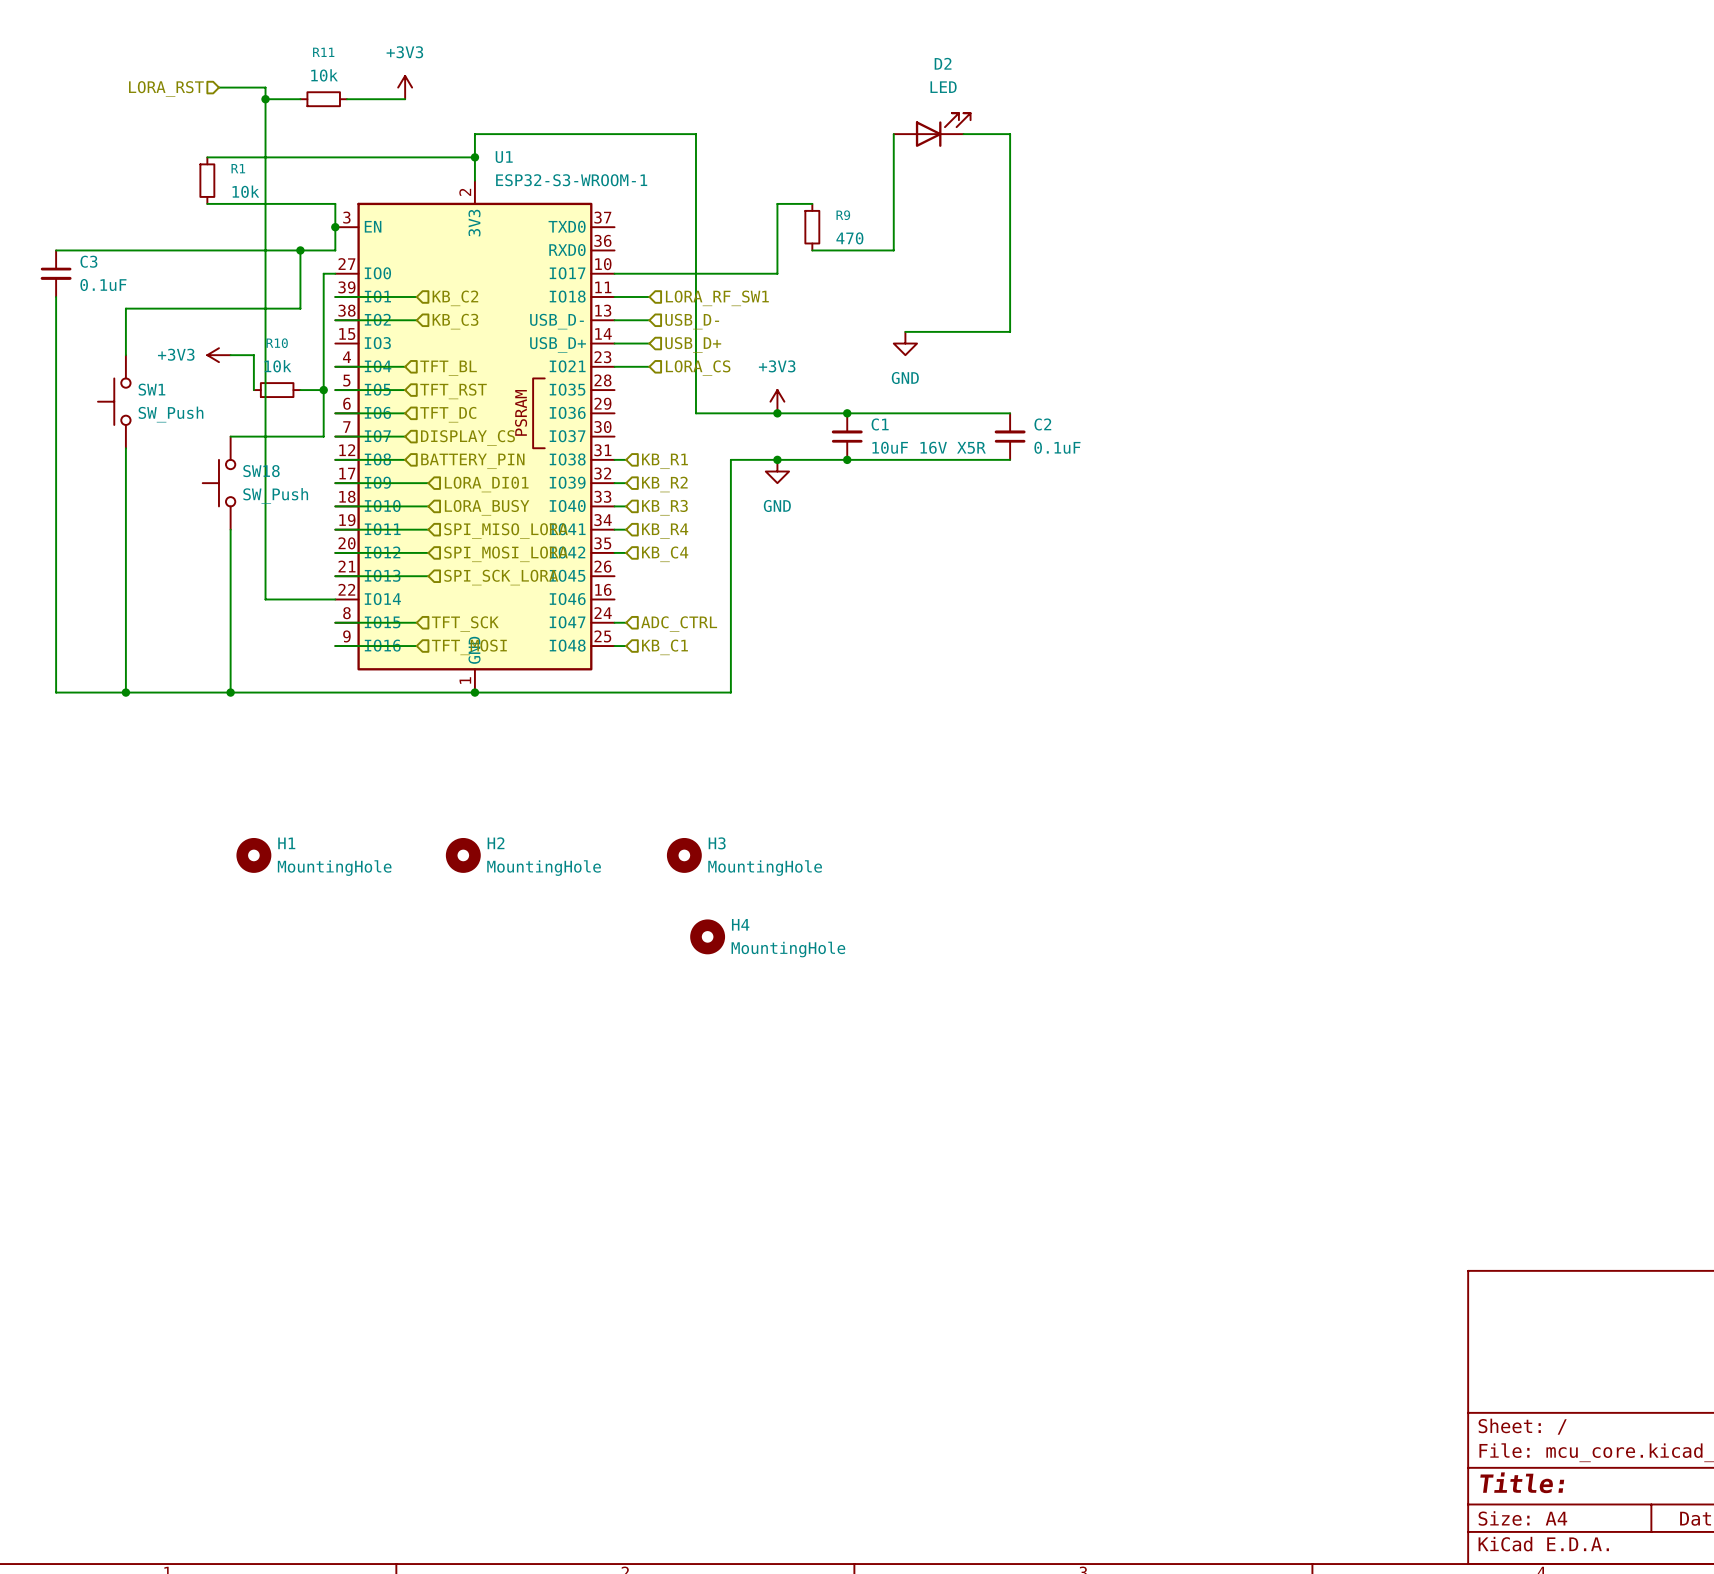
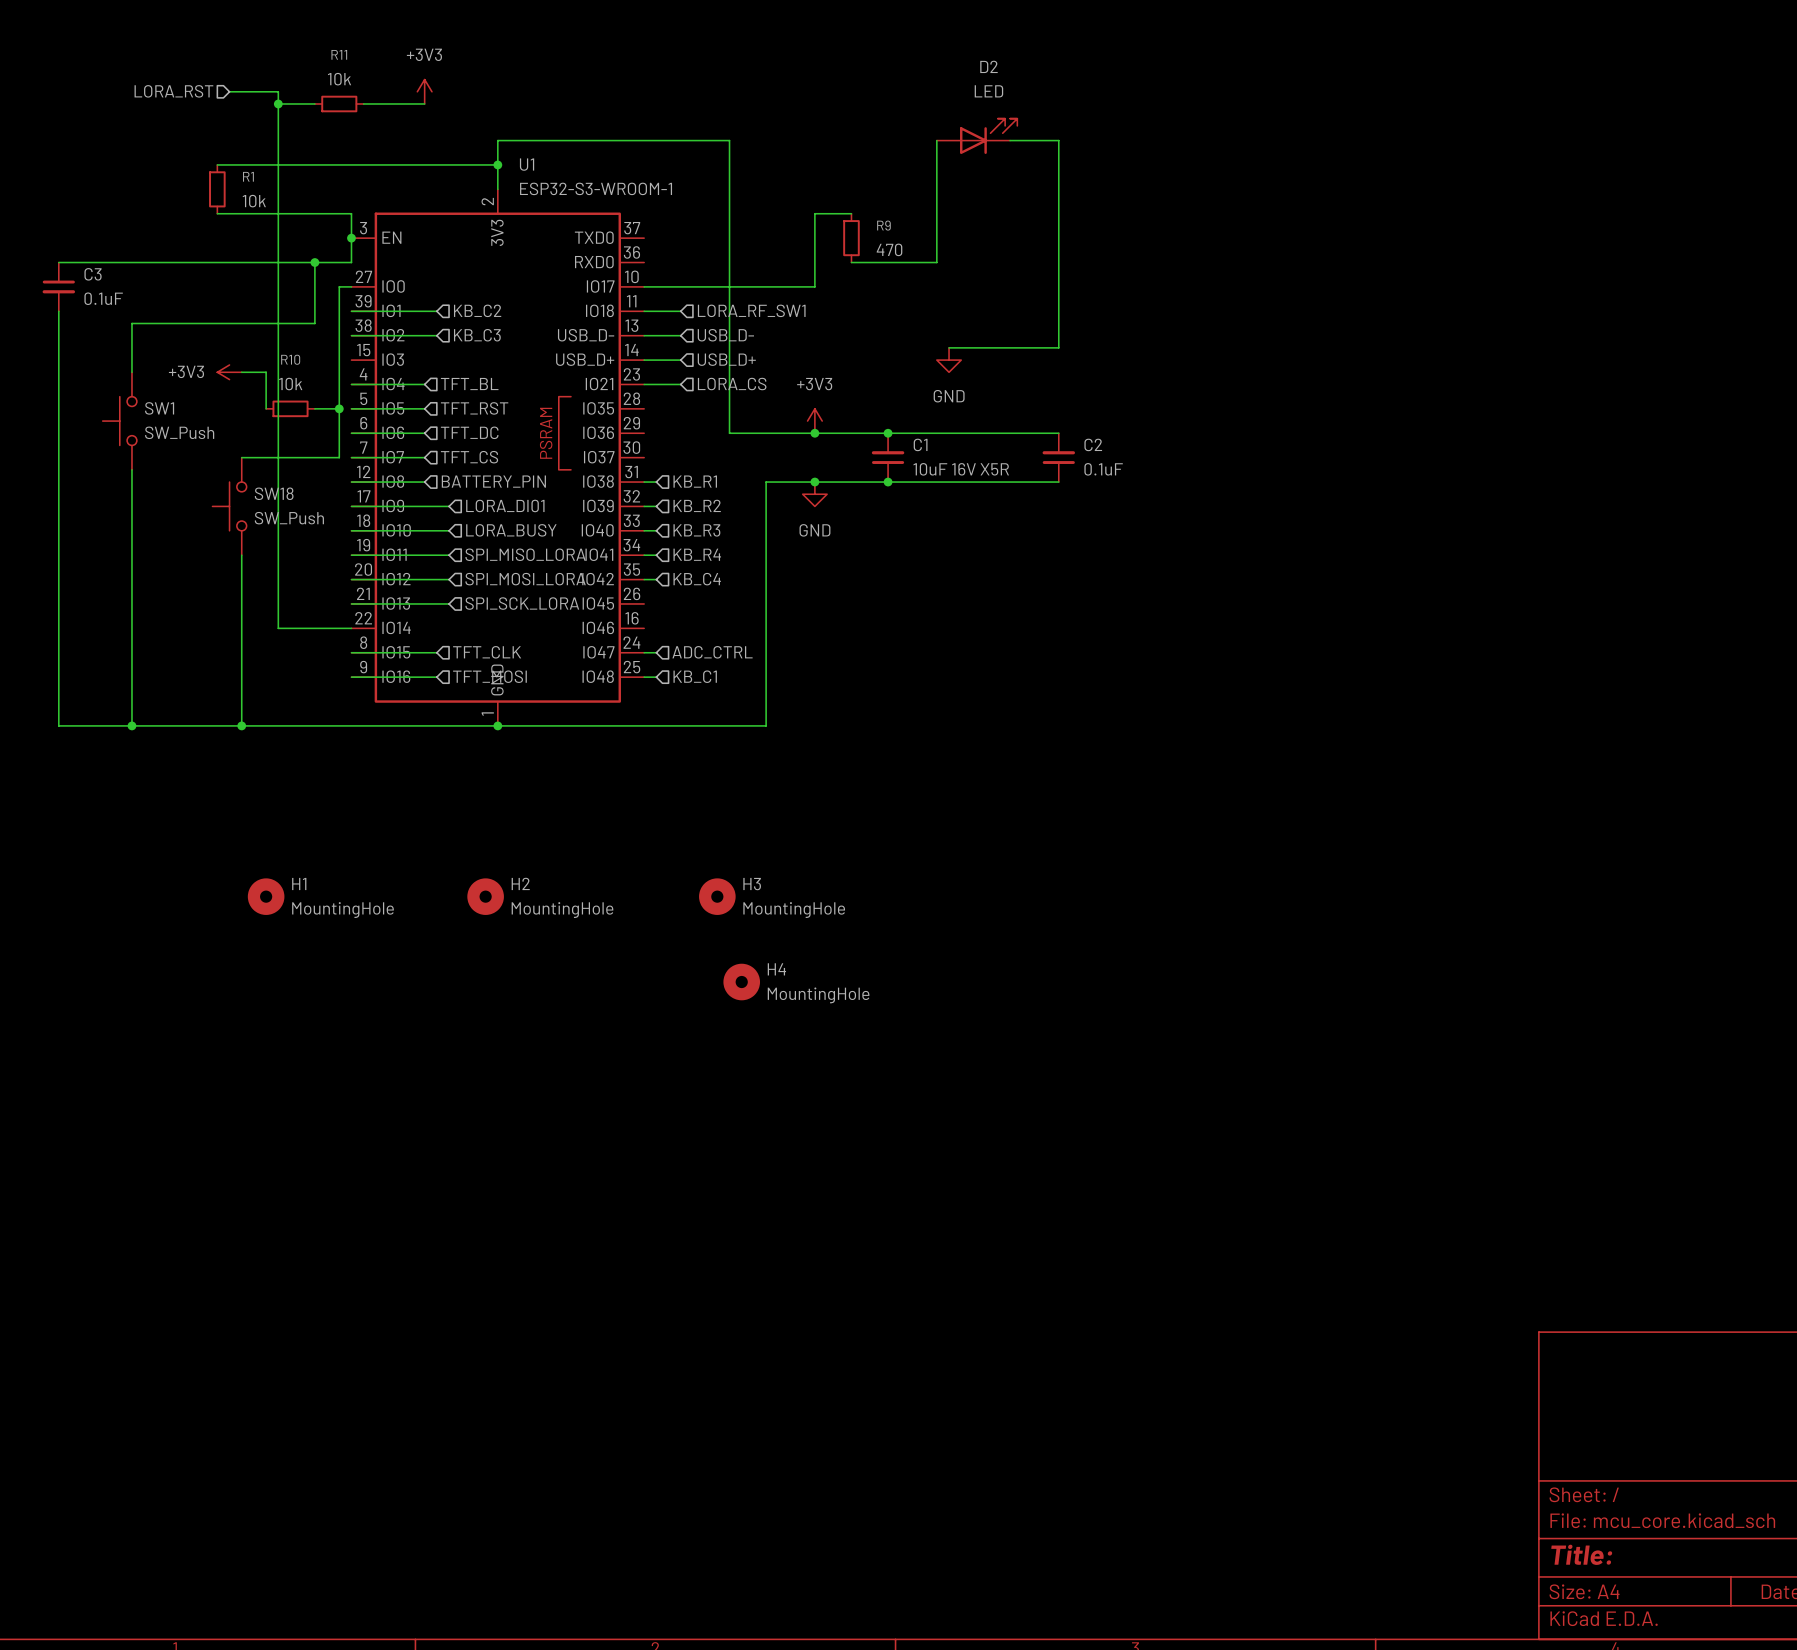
hierarchical label: DISPLAY_CS (467, 437) -> TFT_CS (469, 457)
hierarchical label: TFT_SCK (465, 624) -> TFT_CLK (487, 652)

